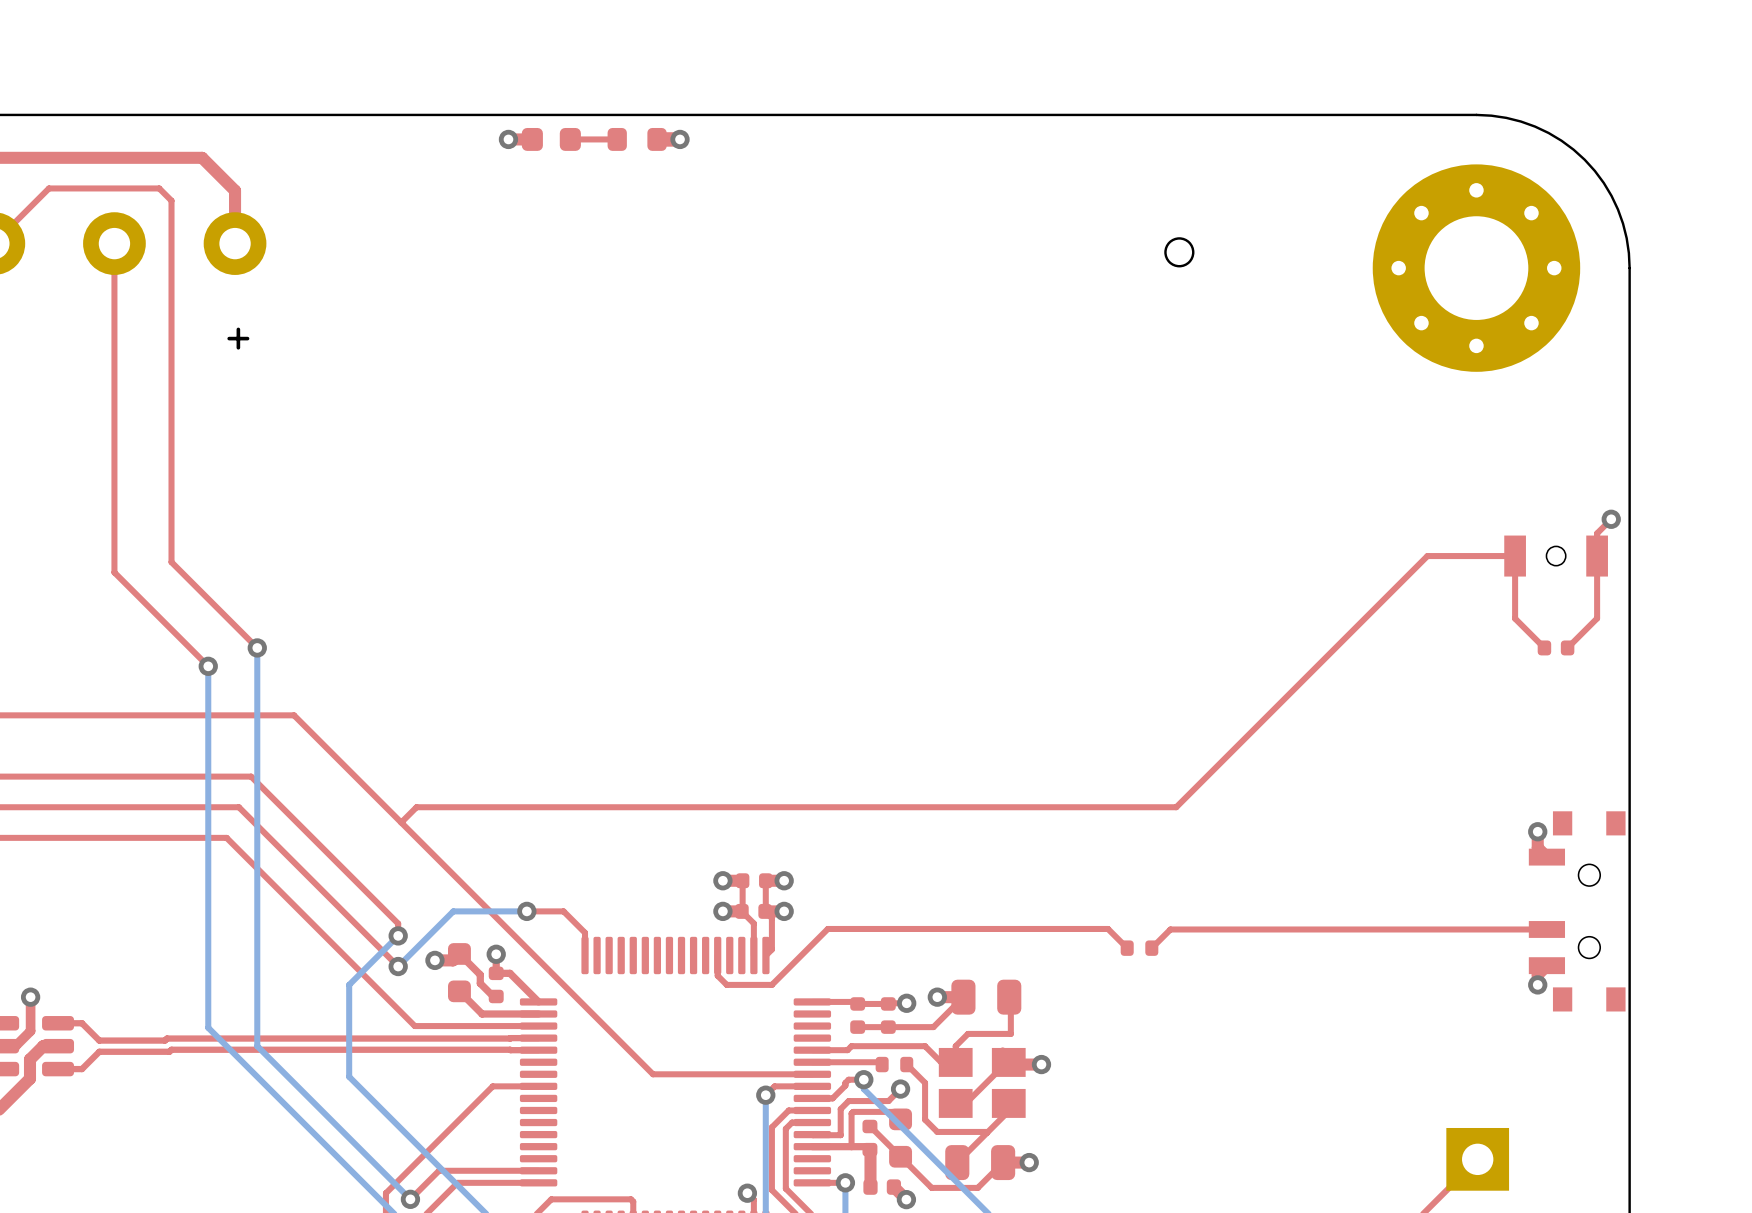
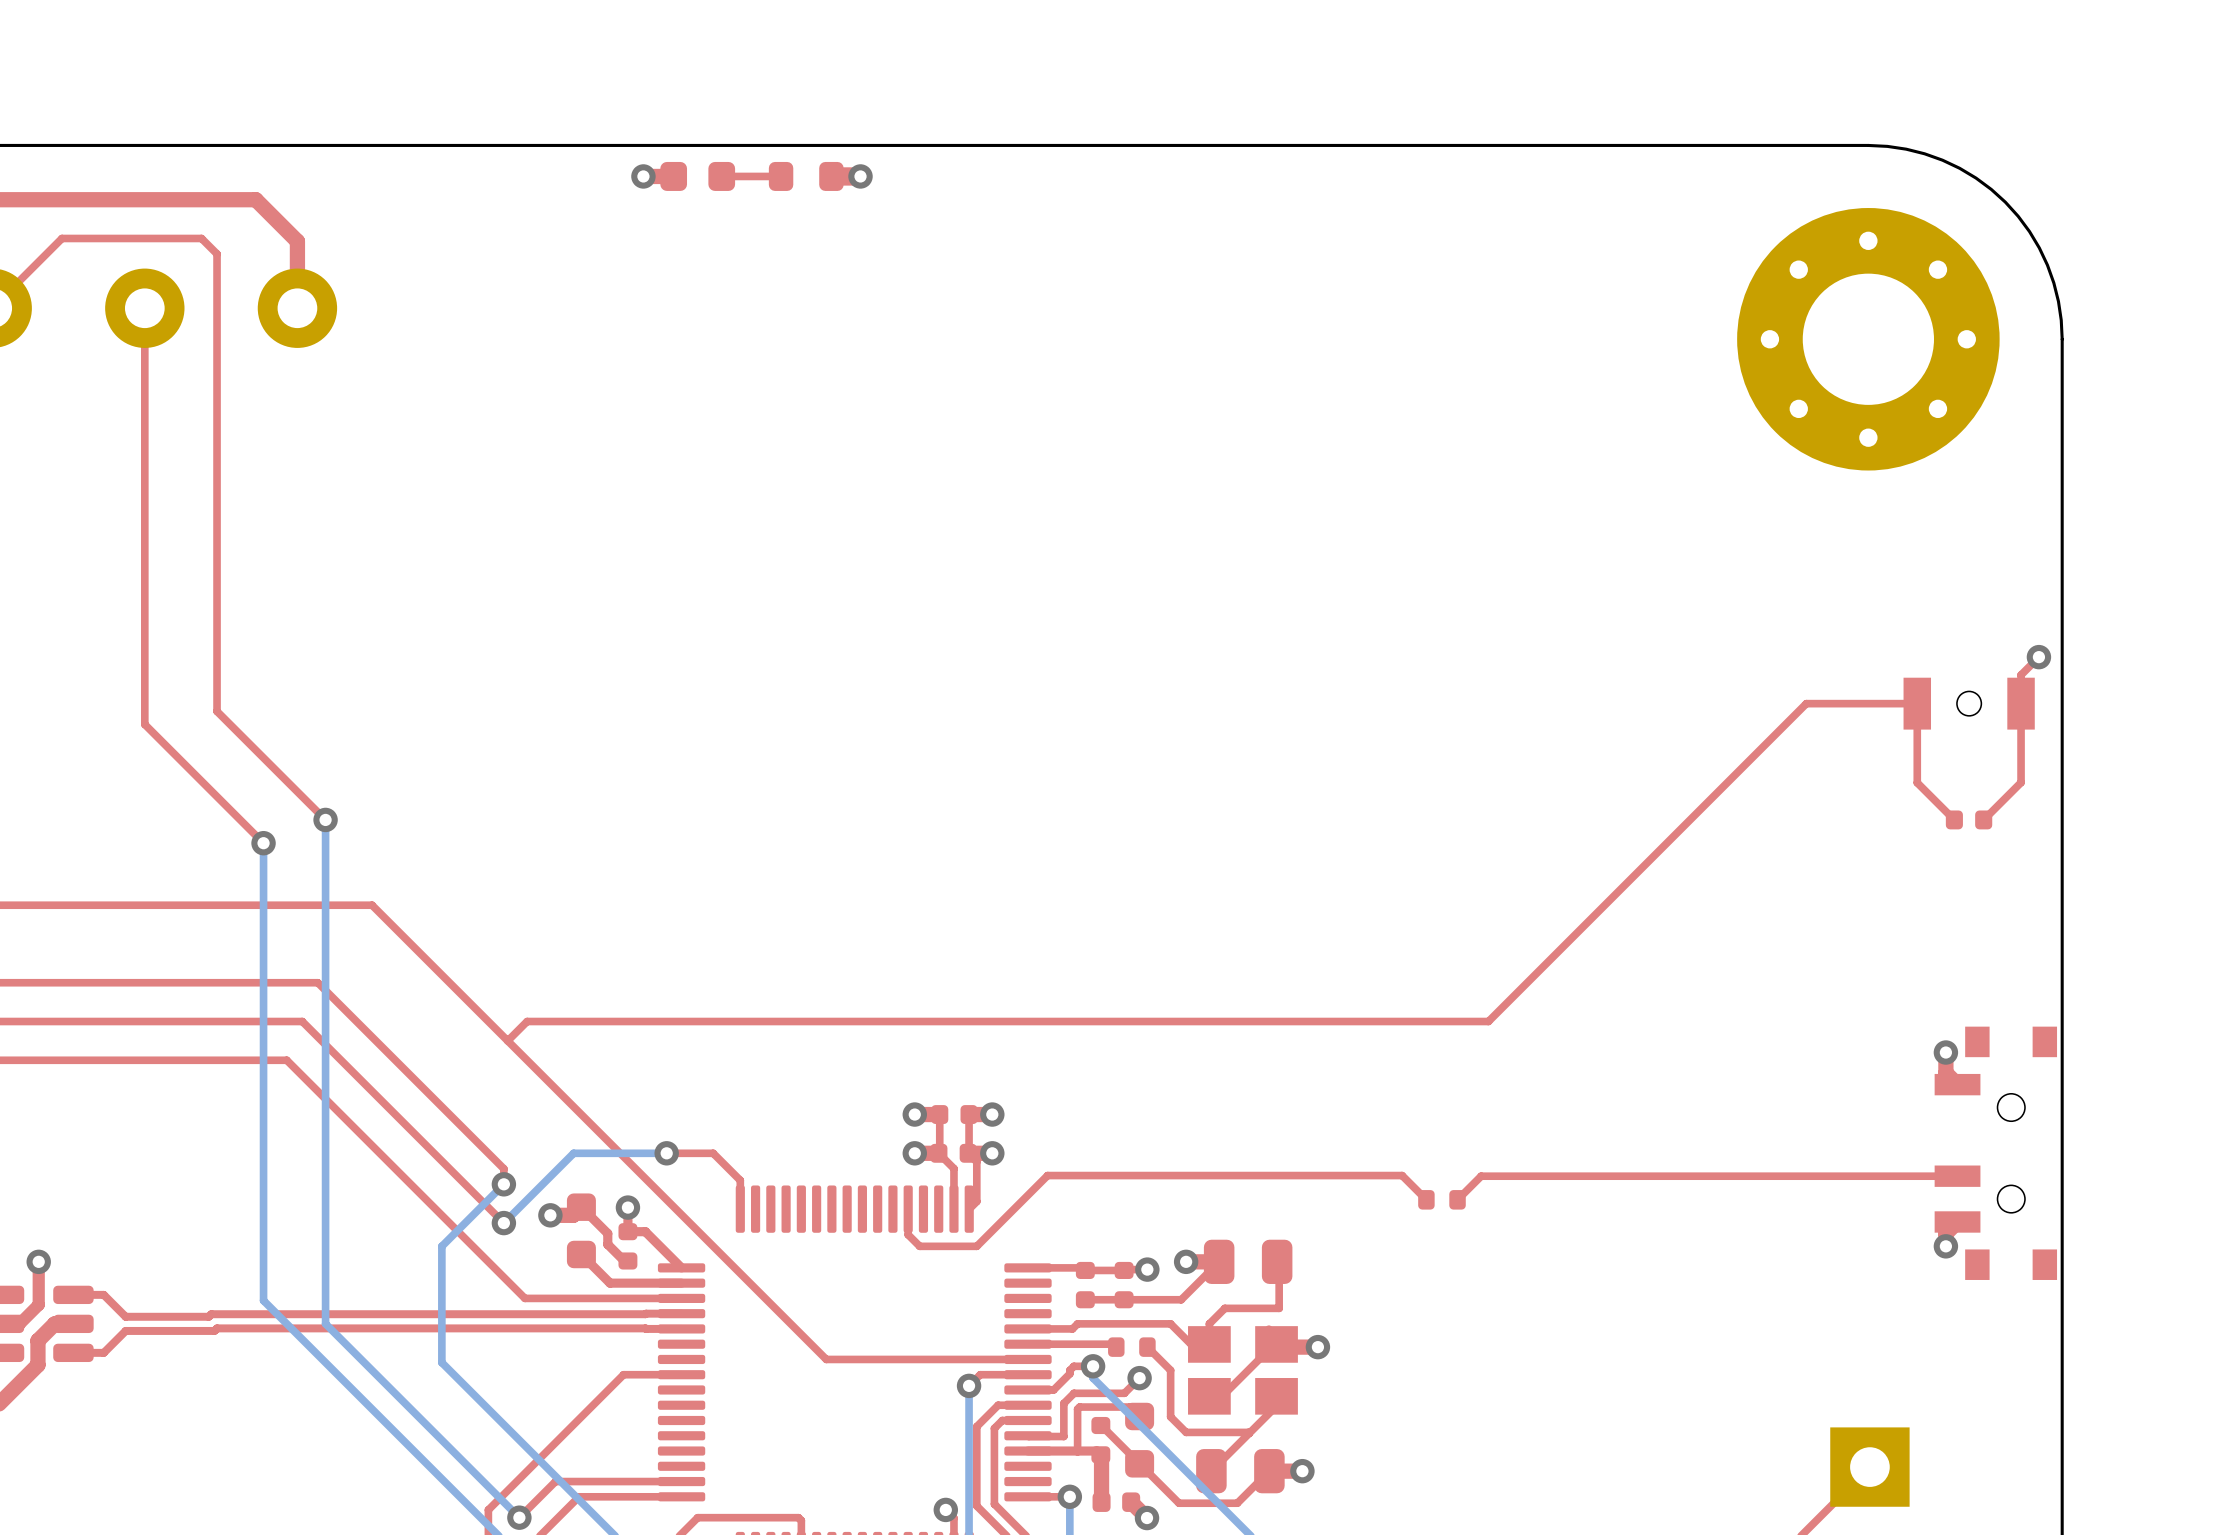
round board edge: [1164, 237, 1195, 268] -> none
text: + (238, 338) -> none

